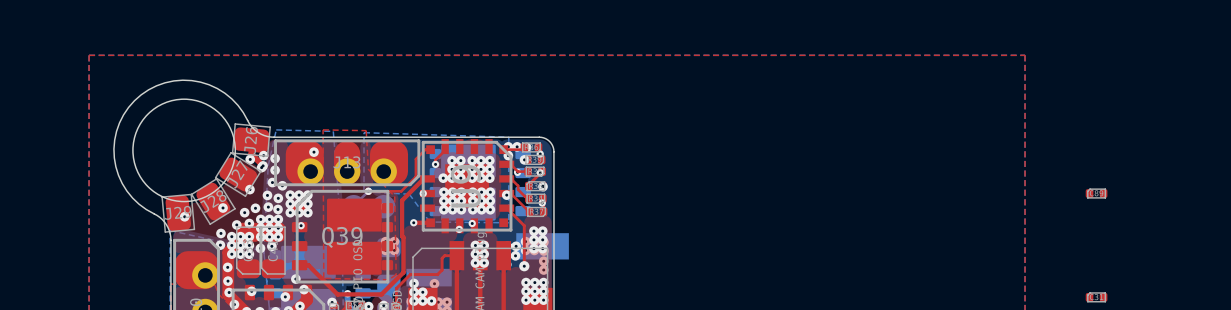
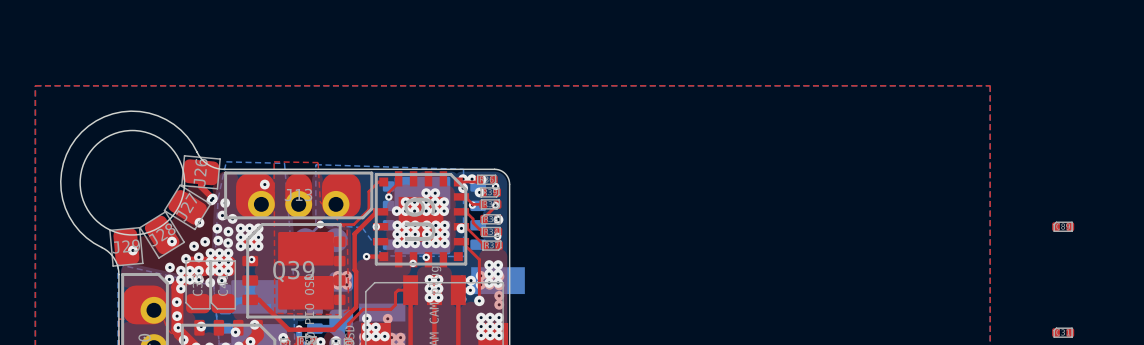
via: (263, 155) -> none
via: (275, 158) -> none
via: (250, 159) -> none
via: (452, 160) -> none
via: (460, 160) -> none
via: (489, 160) -> none
via: (240, 254) -> none
via: (249, 254) -> none
via: (295, 279) -> none

